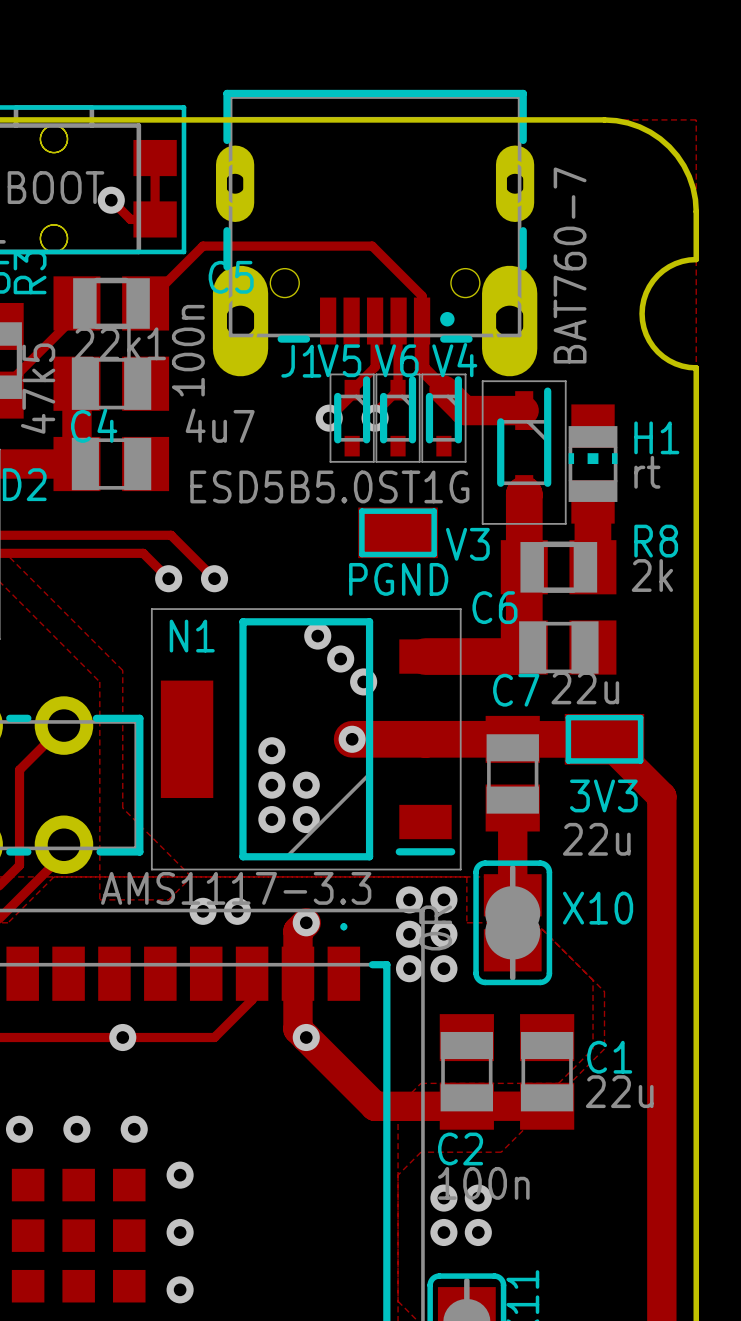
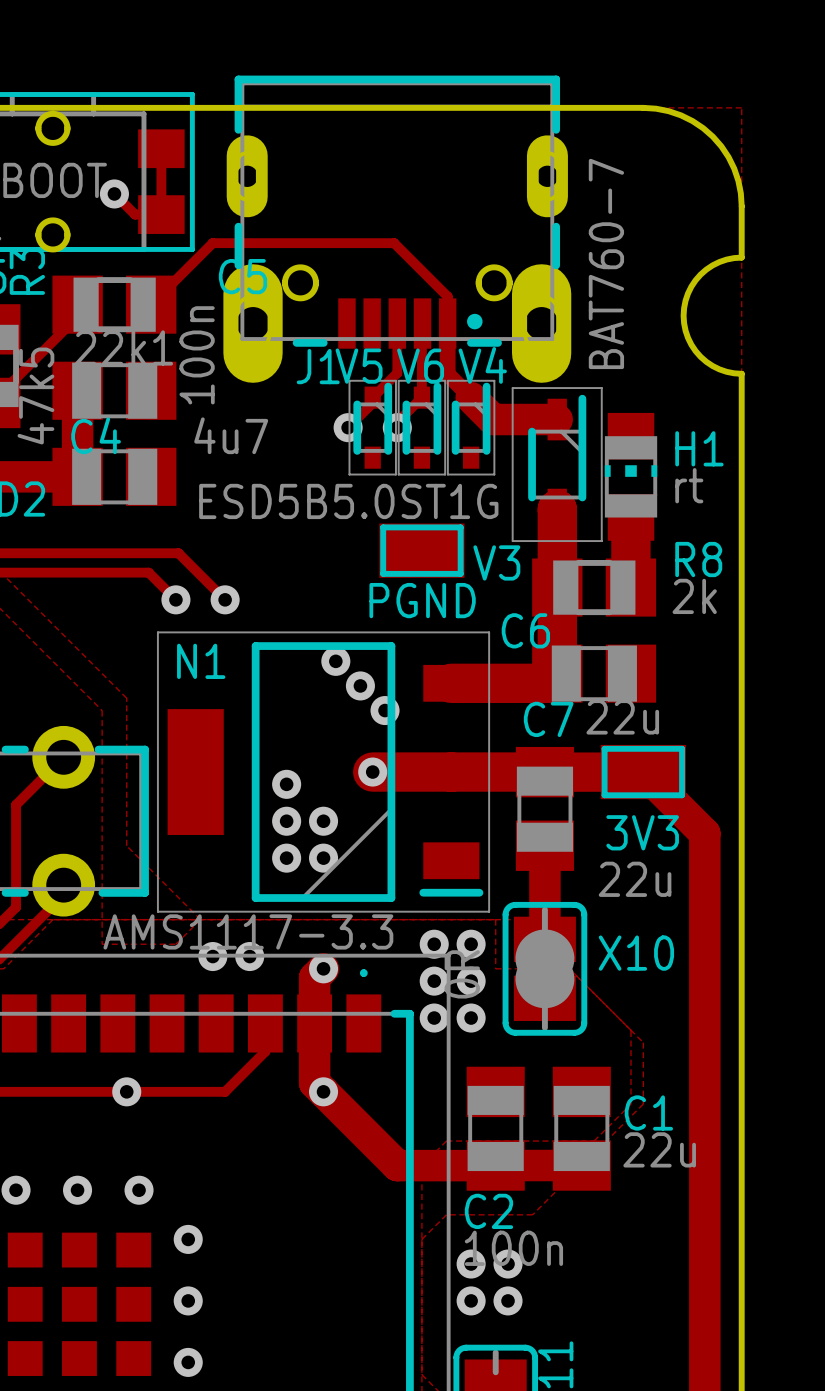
board edge: none -> (38, 127) (41, 137) (51, 142) (61, 140) (67, 129) (64, 119) (54, 113) (44, 116) (38, 127)
board edge: none -> (38, 233) (41, 244) (51, 249) (61, 246) (67, 235) (64, 225) (54, 220) (44, 223) (38, 233)
board edge: none -> (284, 281) (288, 292) (298, 298) (311, 294) (315, 283) (312, 272) (302, 267) (289, 271) (284, 281)
board edge: none -> (478, 281) (482, 292) (492, 298) (504, 294) (509, 283) (506, 272) (496, 267) (483, 271) (478, 281)

